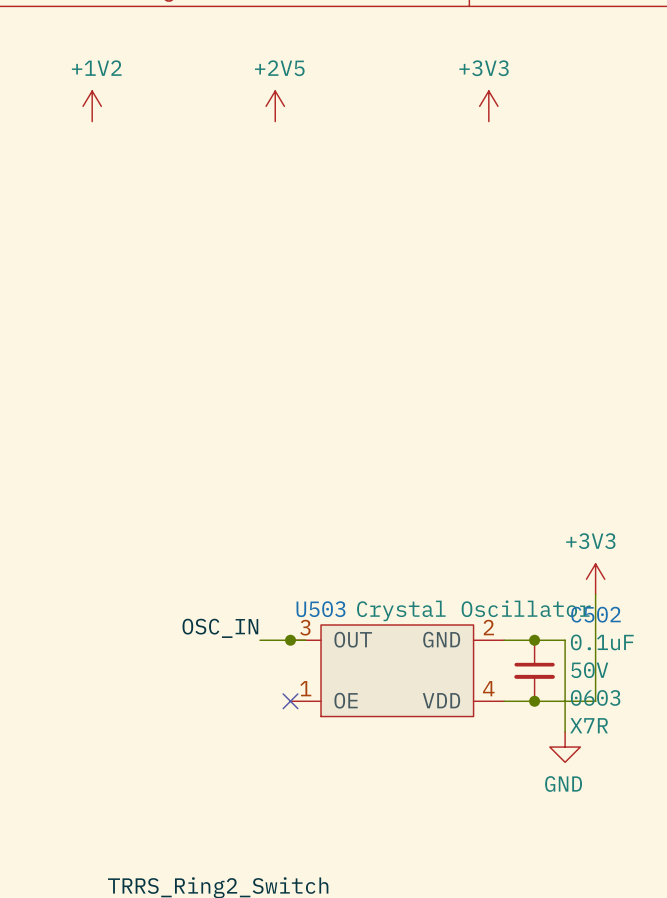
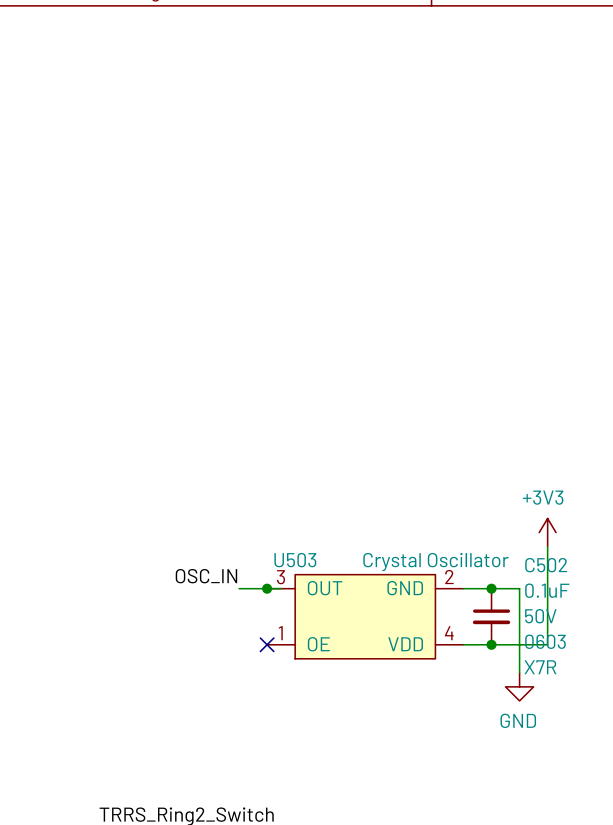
power symbol: +1V2 (92, 106) -> none
power symbol: +2V5 (275, 106) -> none
power symbol: +3V3 (488, 106) -> none

